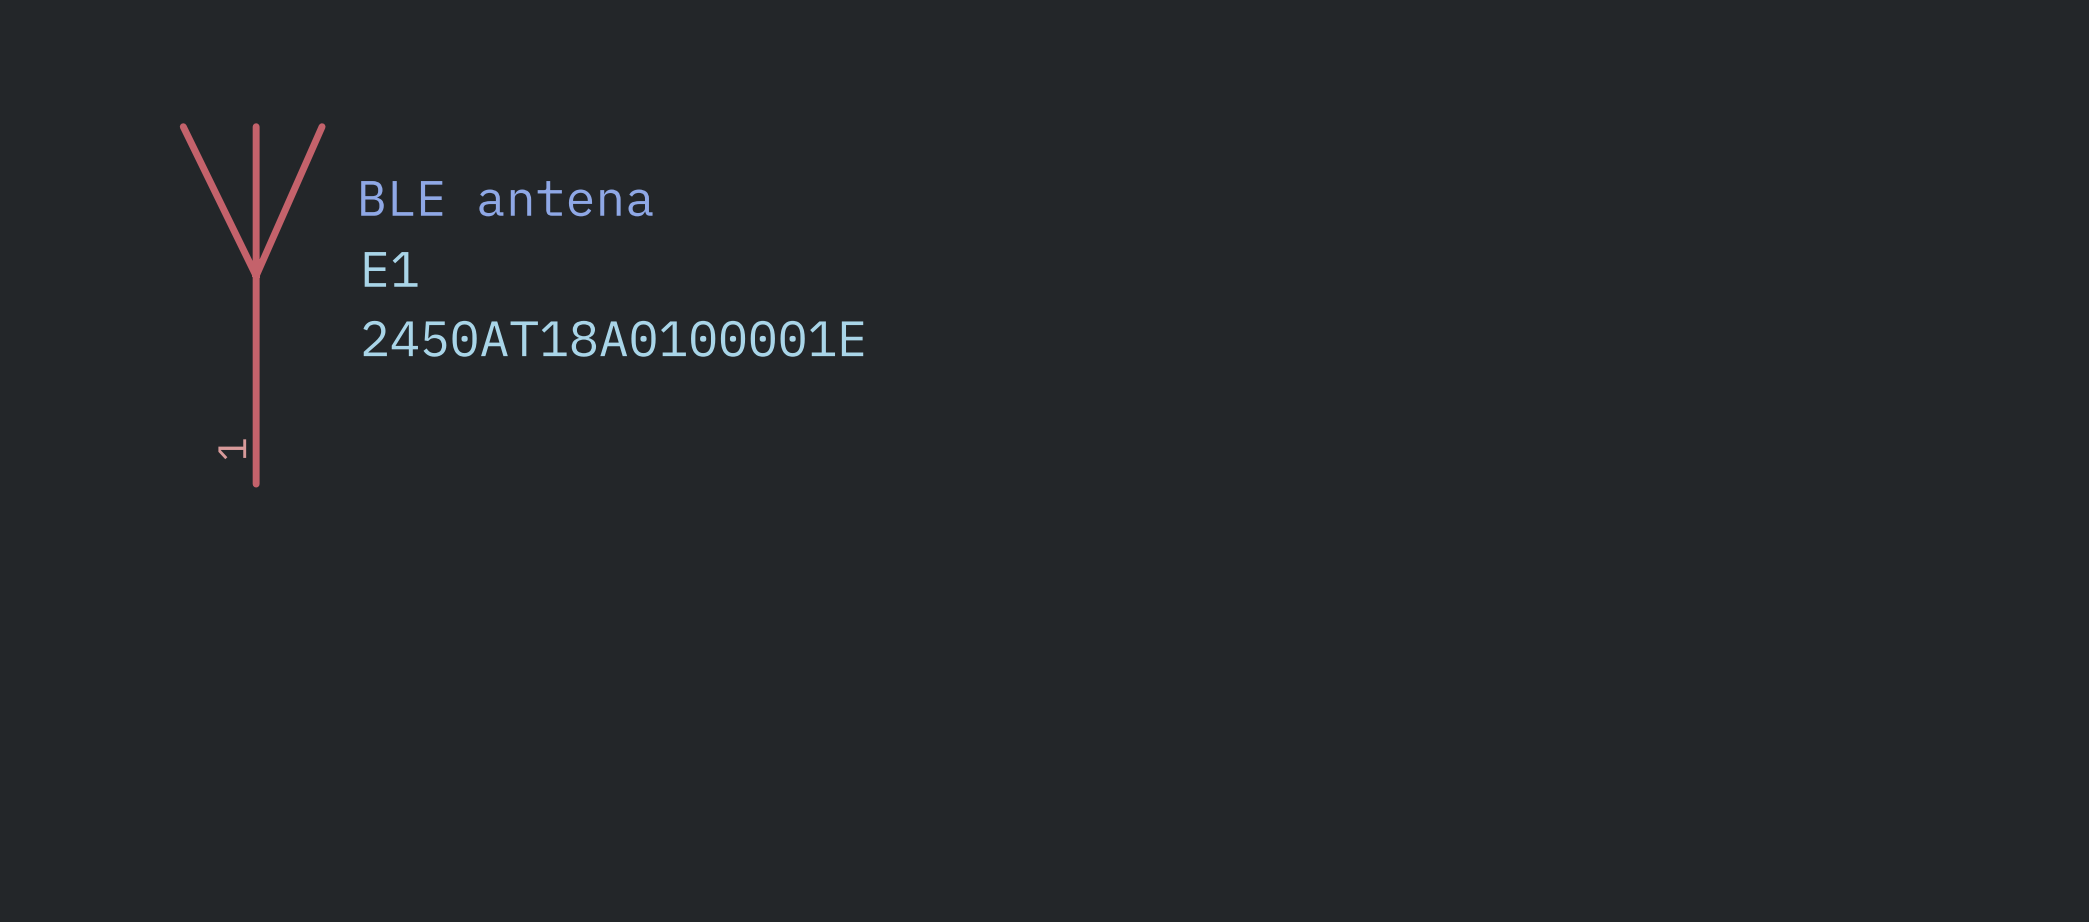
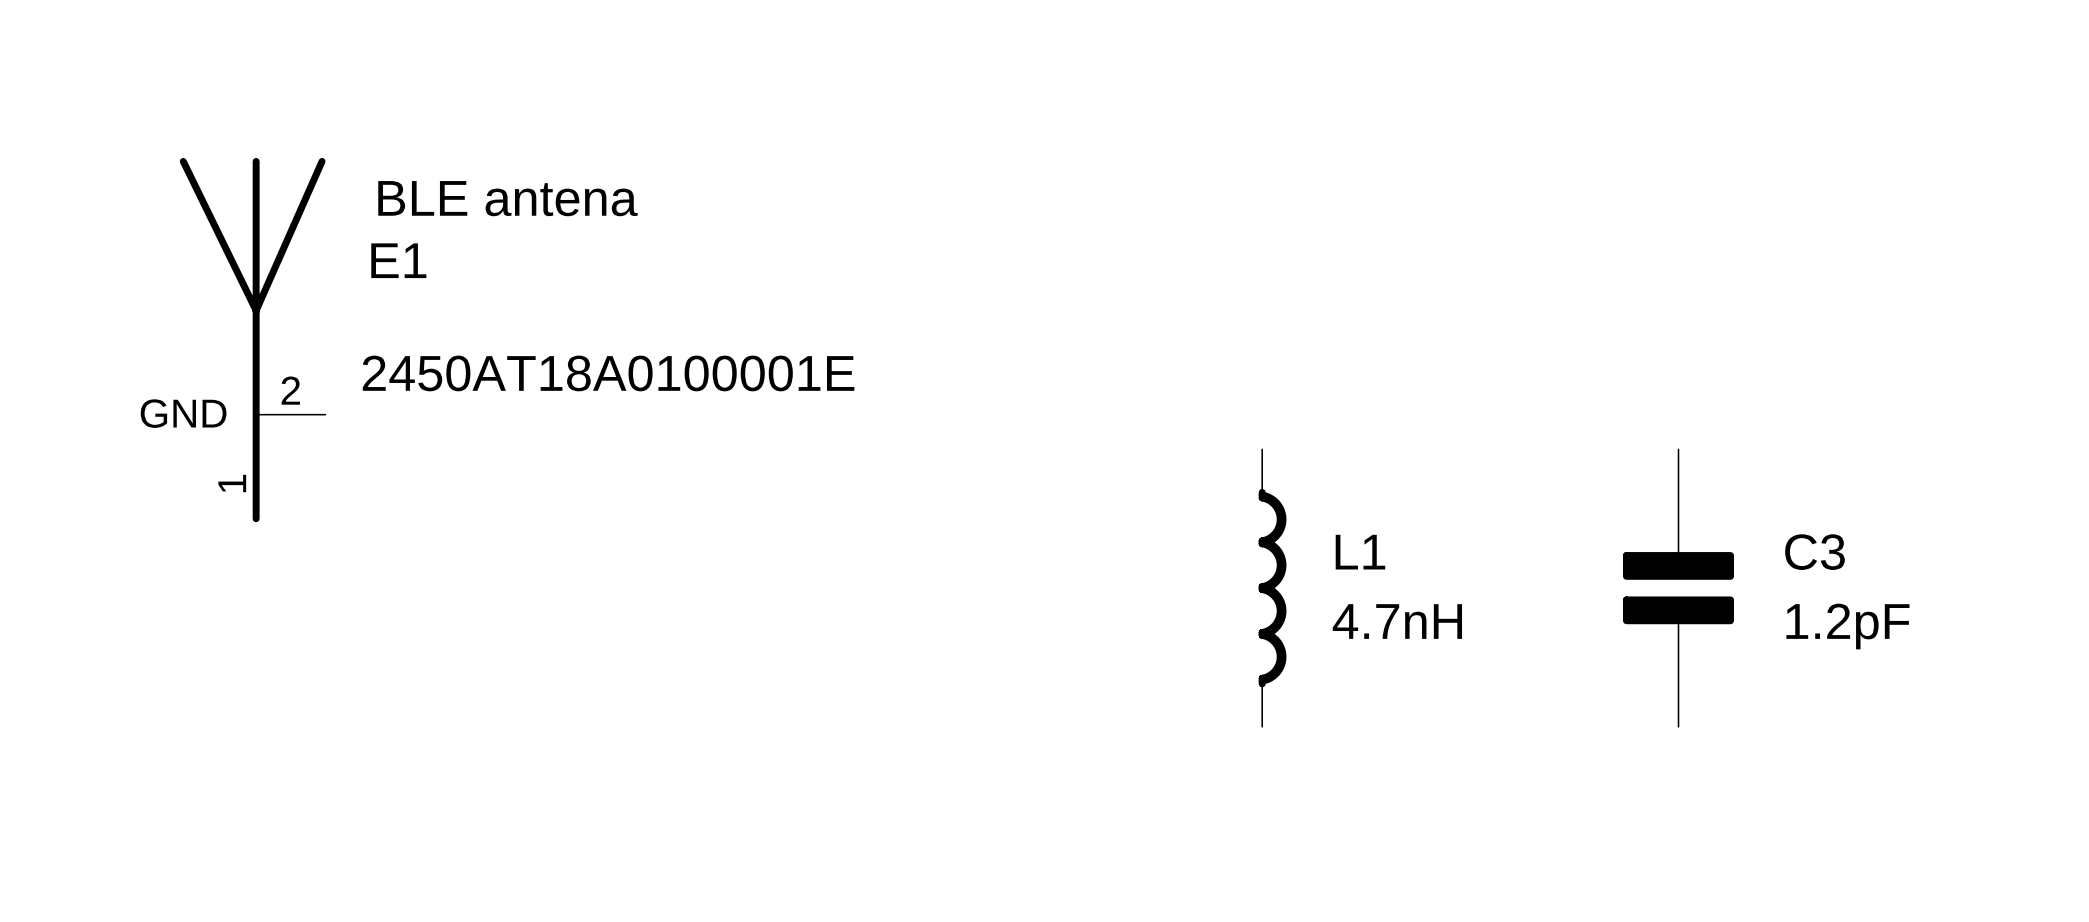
E1 symbol: [179, 123, 326, 488] -> [179, 157, 326, 523]
L1: none -> 4.7nH (1272, 588)
C3: none -> 1.2pF (1678, 588)

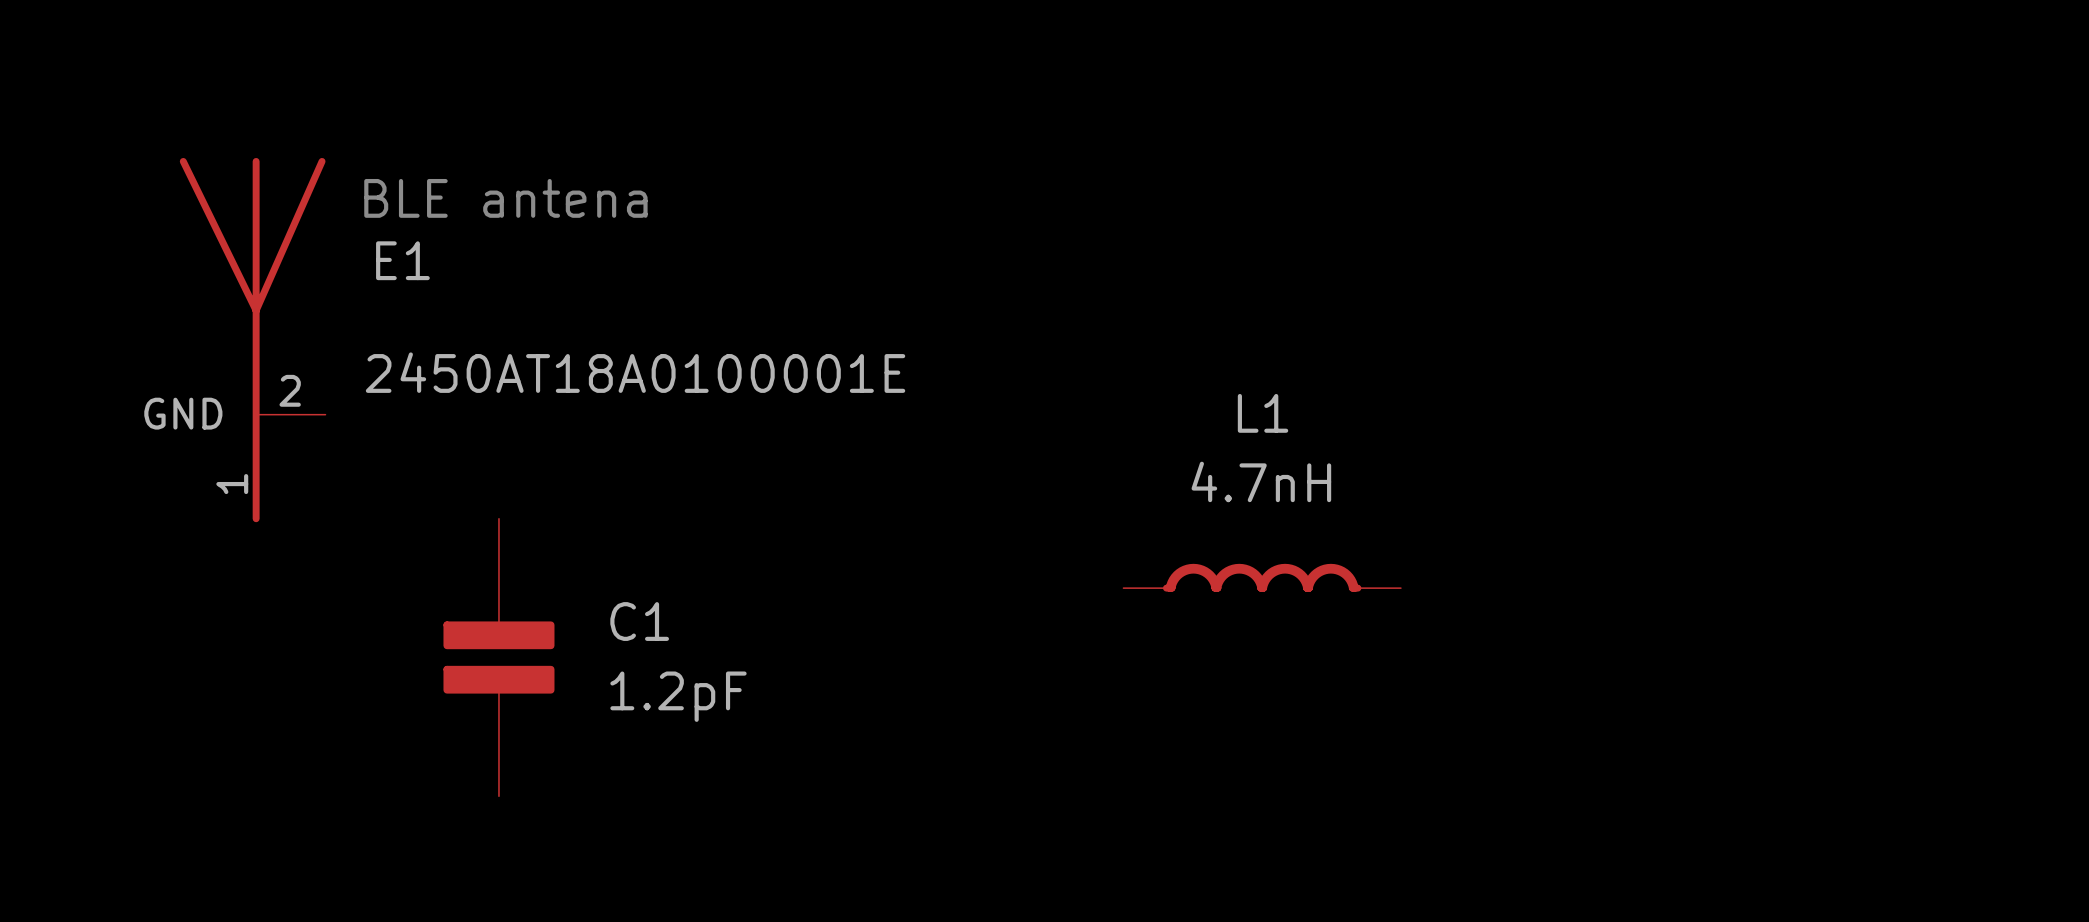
L1 name position: L1 (1360, 552) -> L1 (1263, 413)
L1 rotation: 0° (1272, 588) -> 90° counterclockwise (1262, 577)
C3: 1.2pF (1678, 588) -> none
L1 value position: 4.7nH (1397, 621) -> 4.7nH (1261, 481)
C1: none -> 1.2pF (498, 657)

